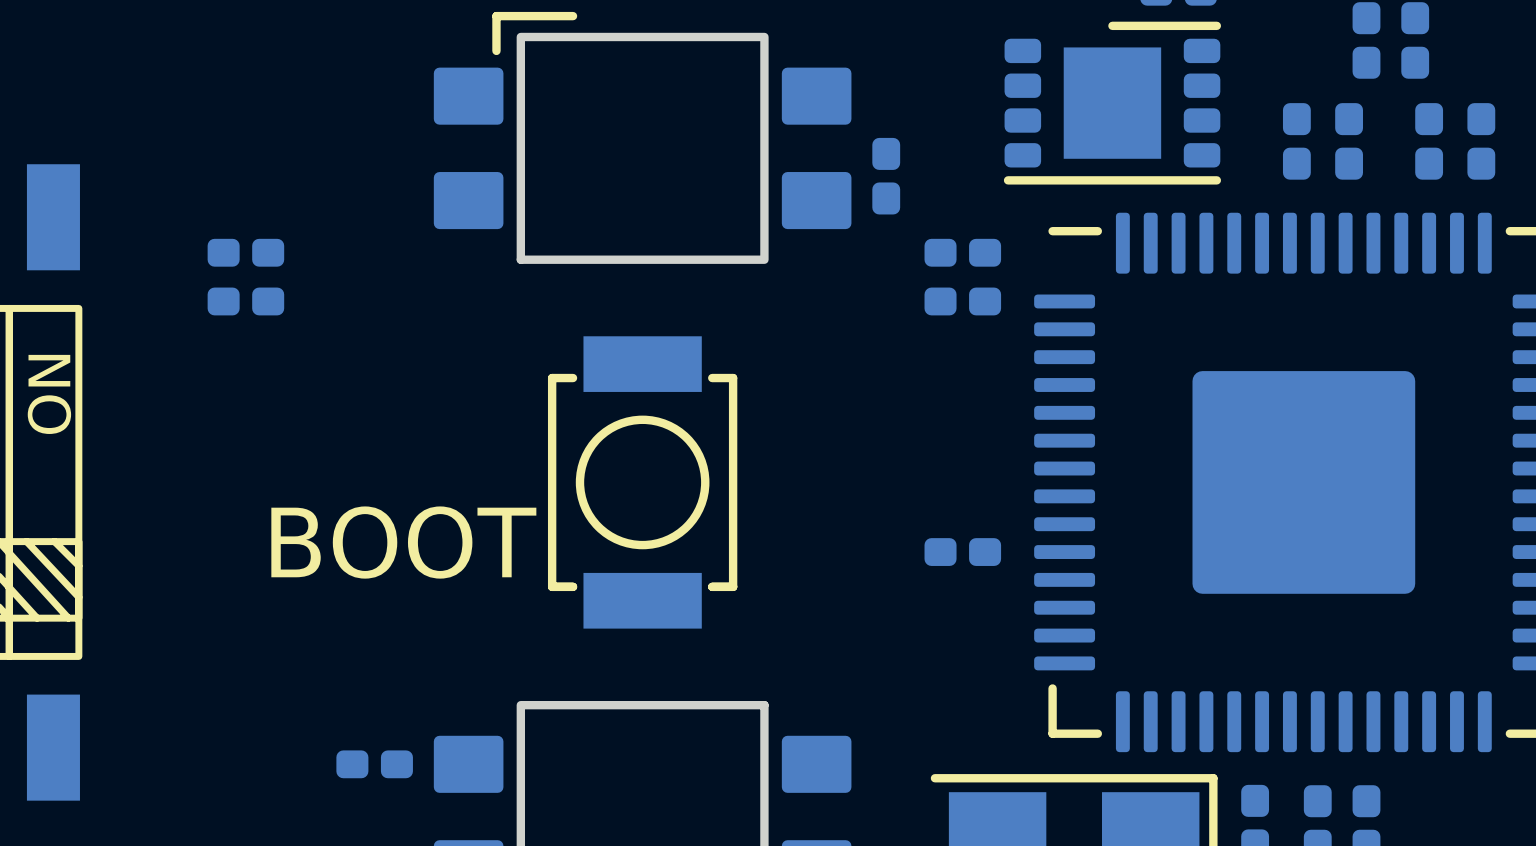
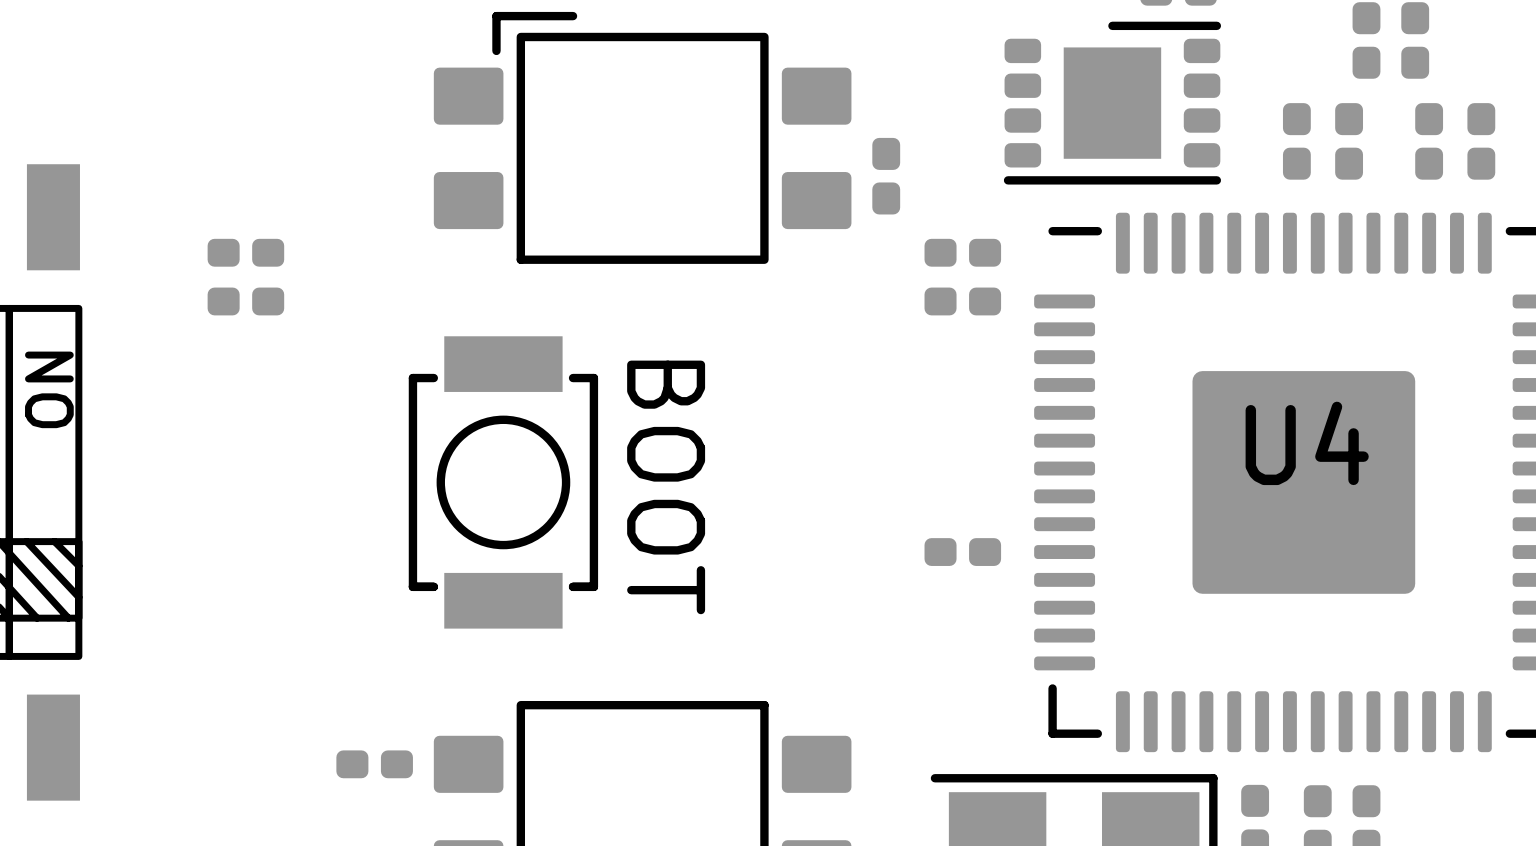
U4: none -> (1307, 443)
part position: (642, 482) -> (503, 482)
text rotation: 0° (403, 542) -> 90° clockwise (666, 487)

